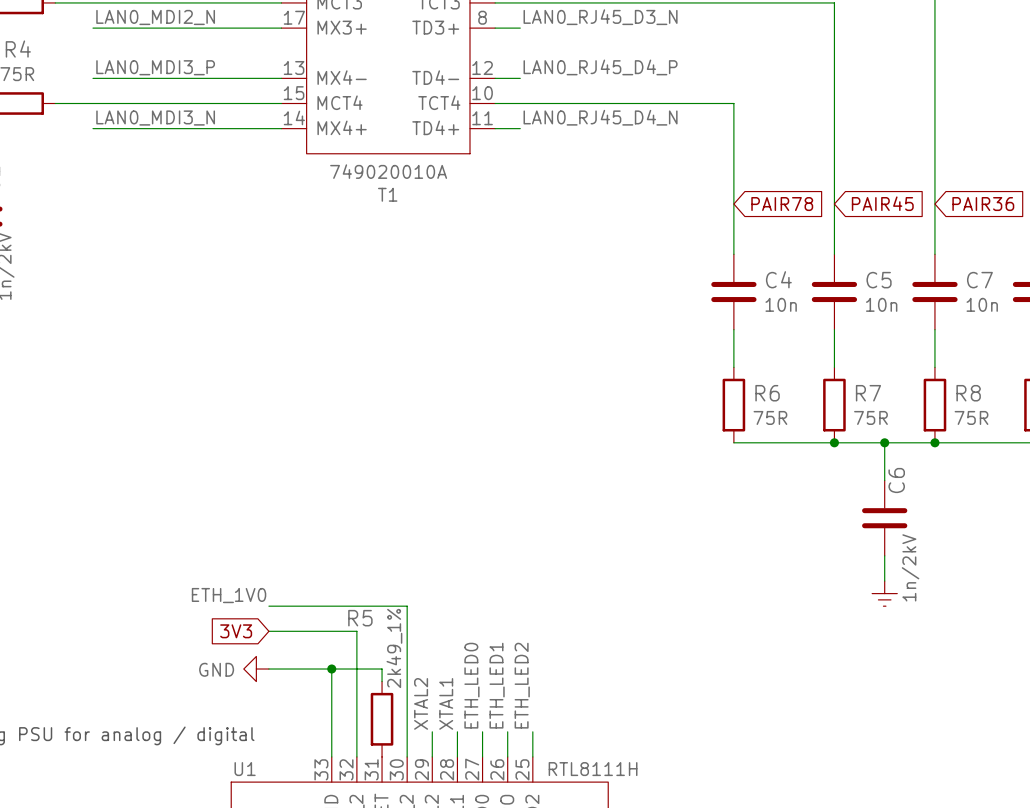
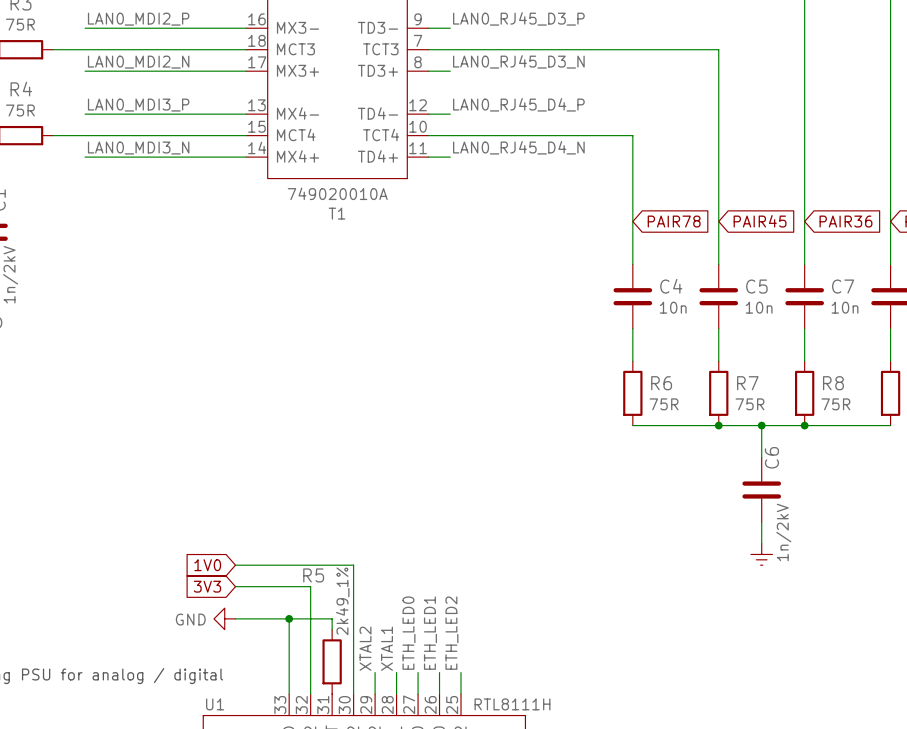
label: ETH_1V0 (229, 595) -> none
global label: none -> 1V0 (207, 565)

